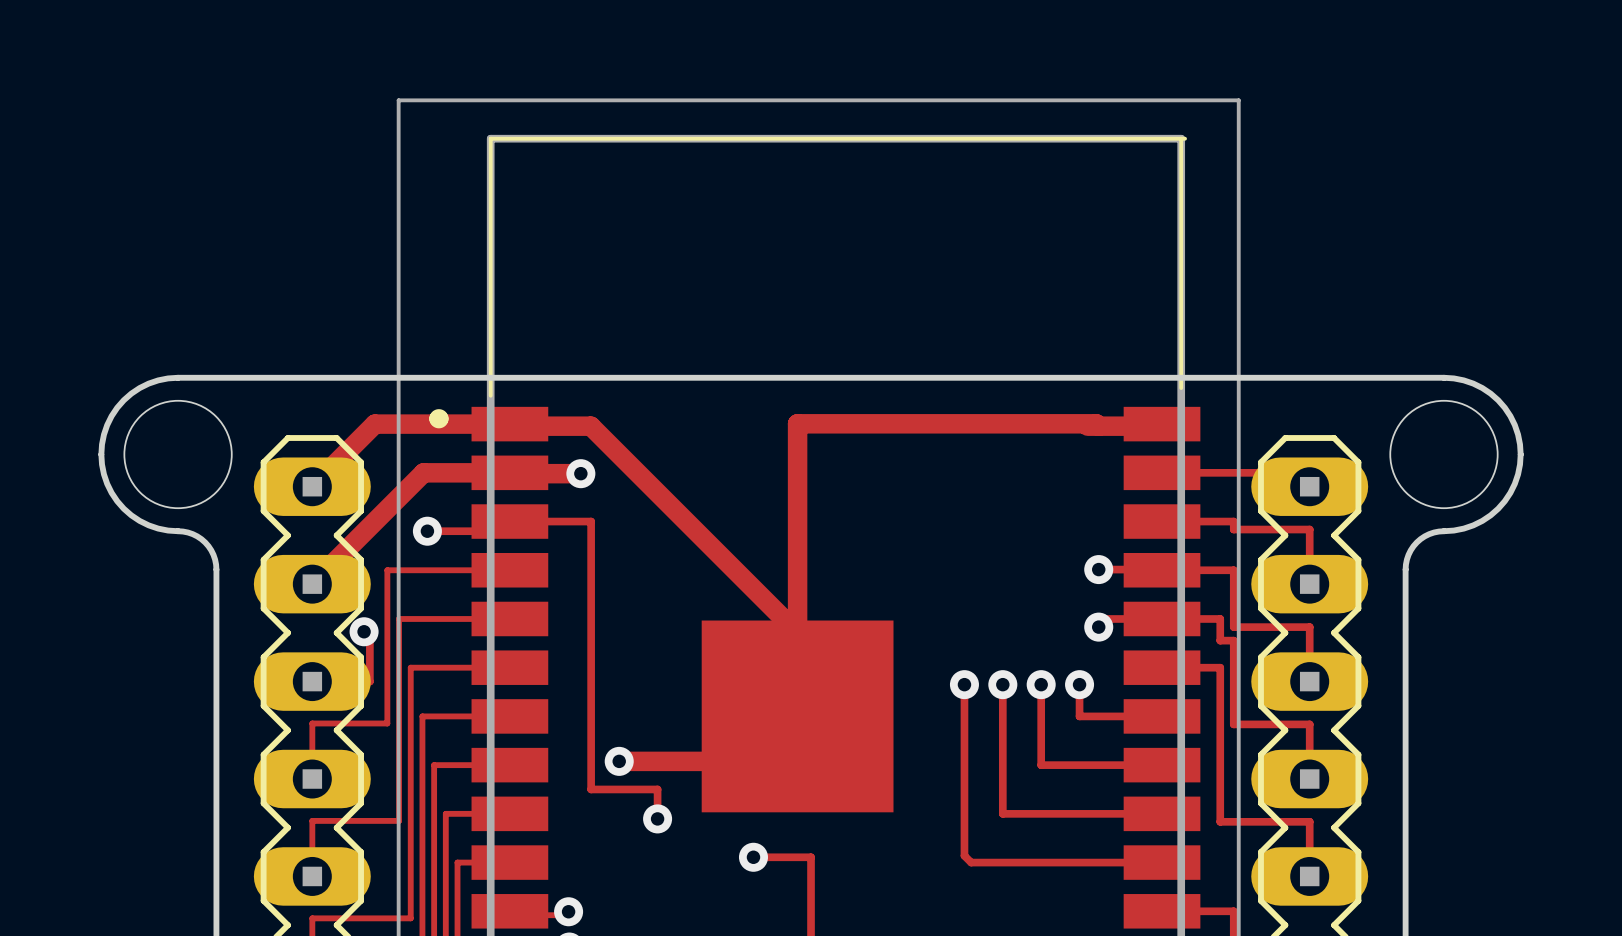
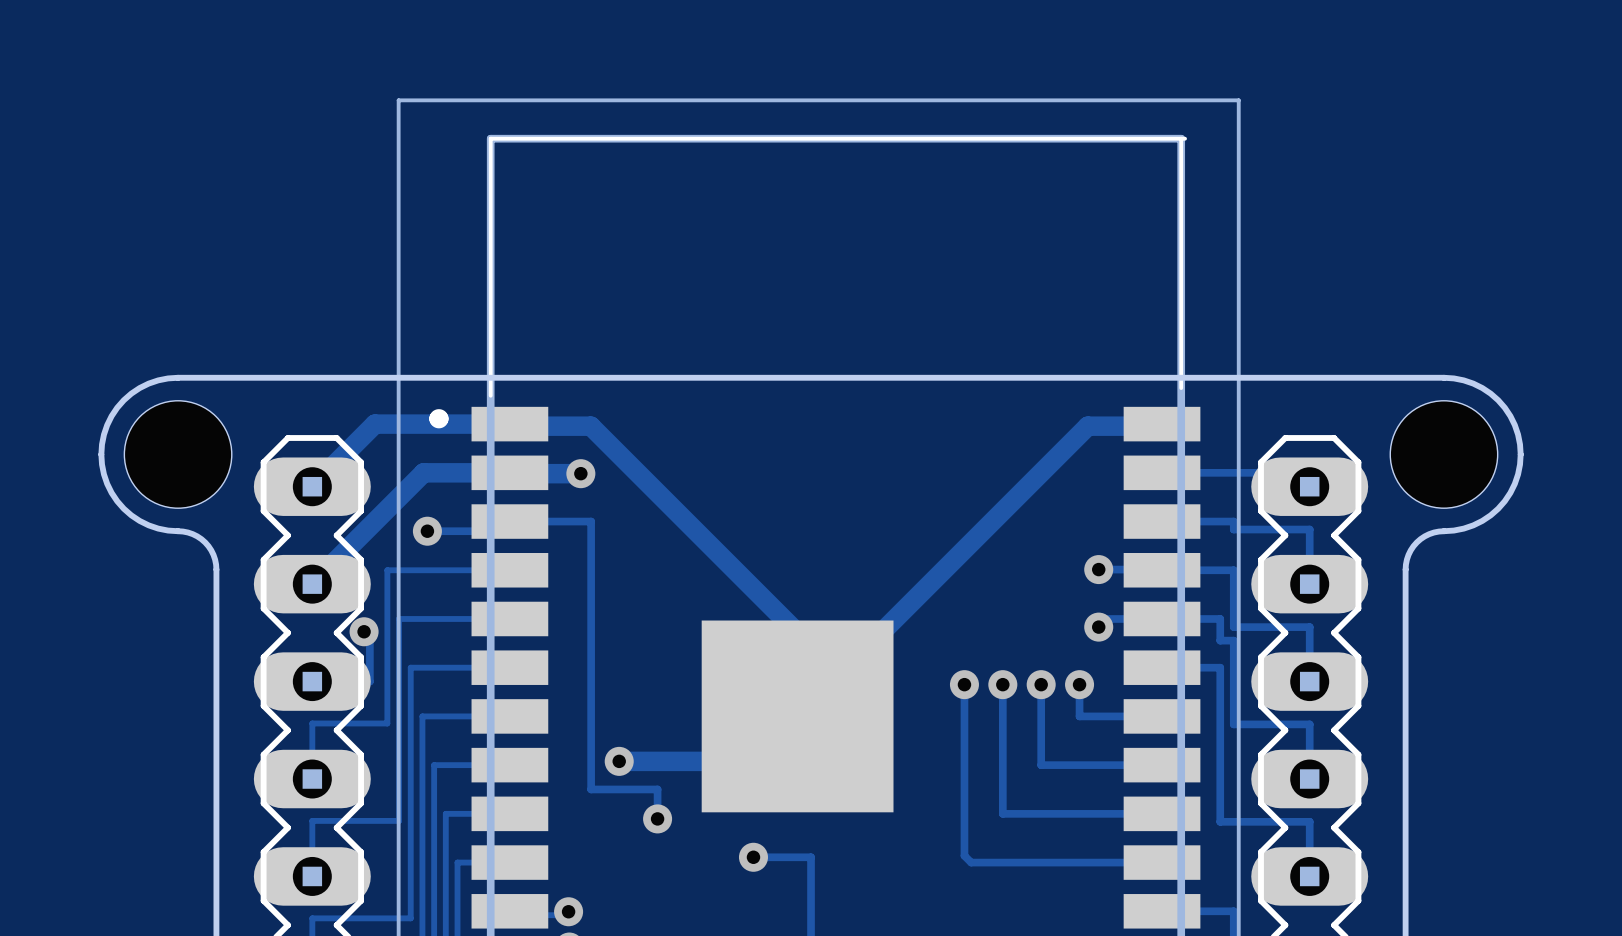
track: none -> (1087, 426) (797, 716) (797, 761)
track: (1098, 426) (1096, 423) (797, 423) (797, 632) -> none

